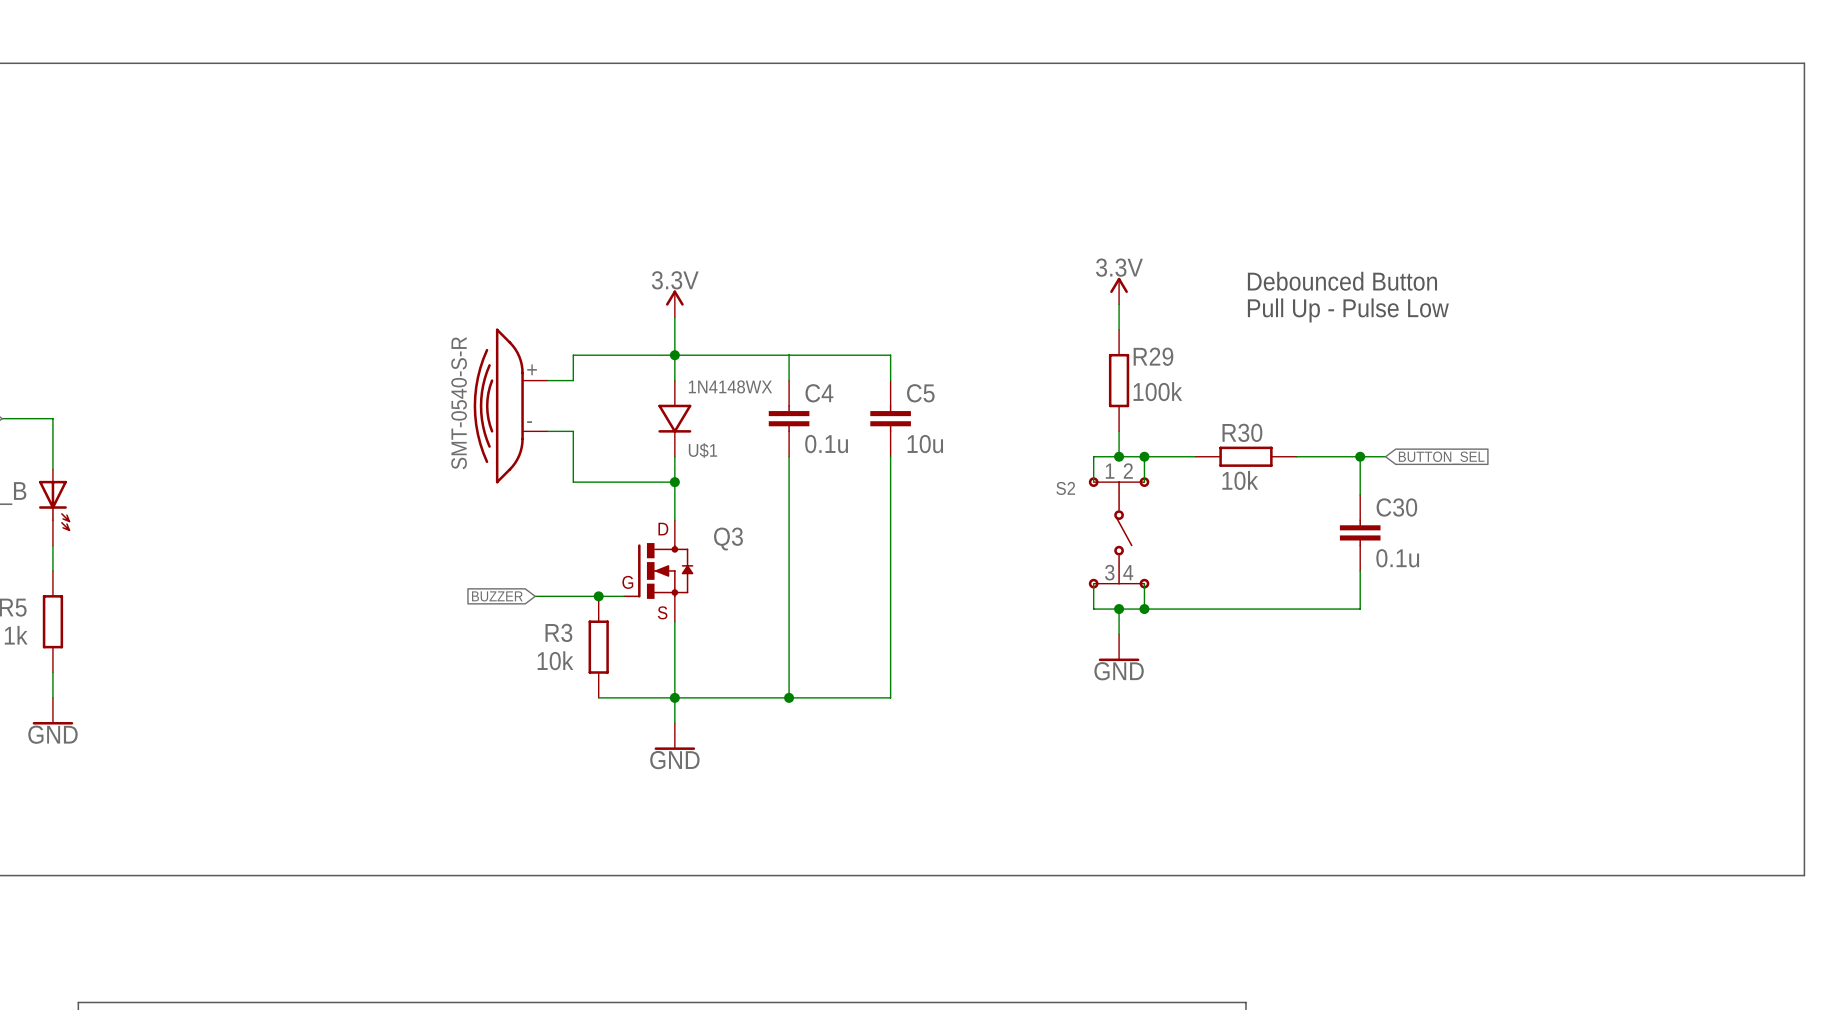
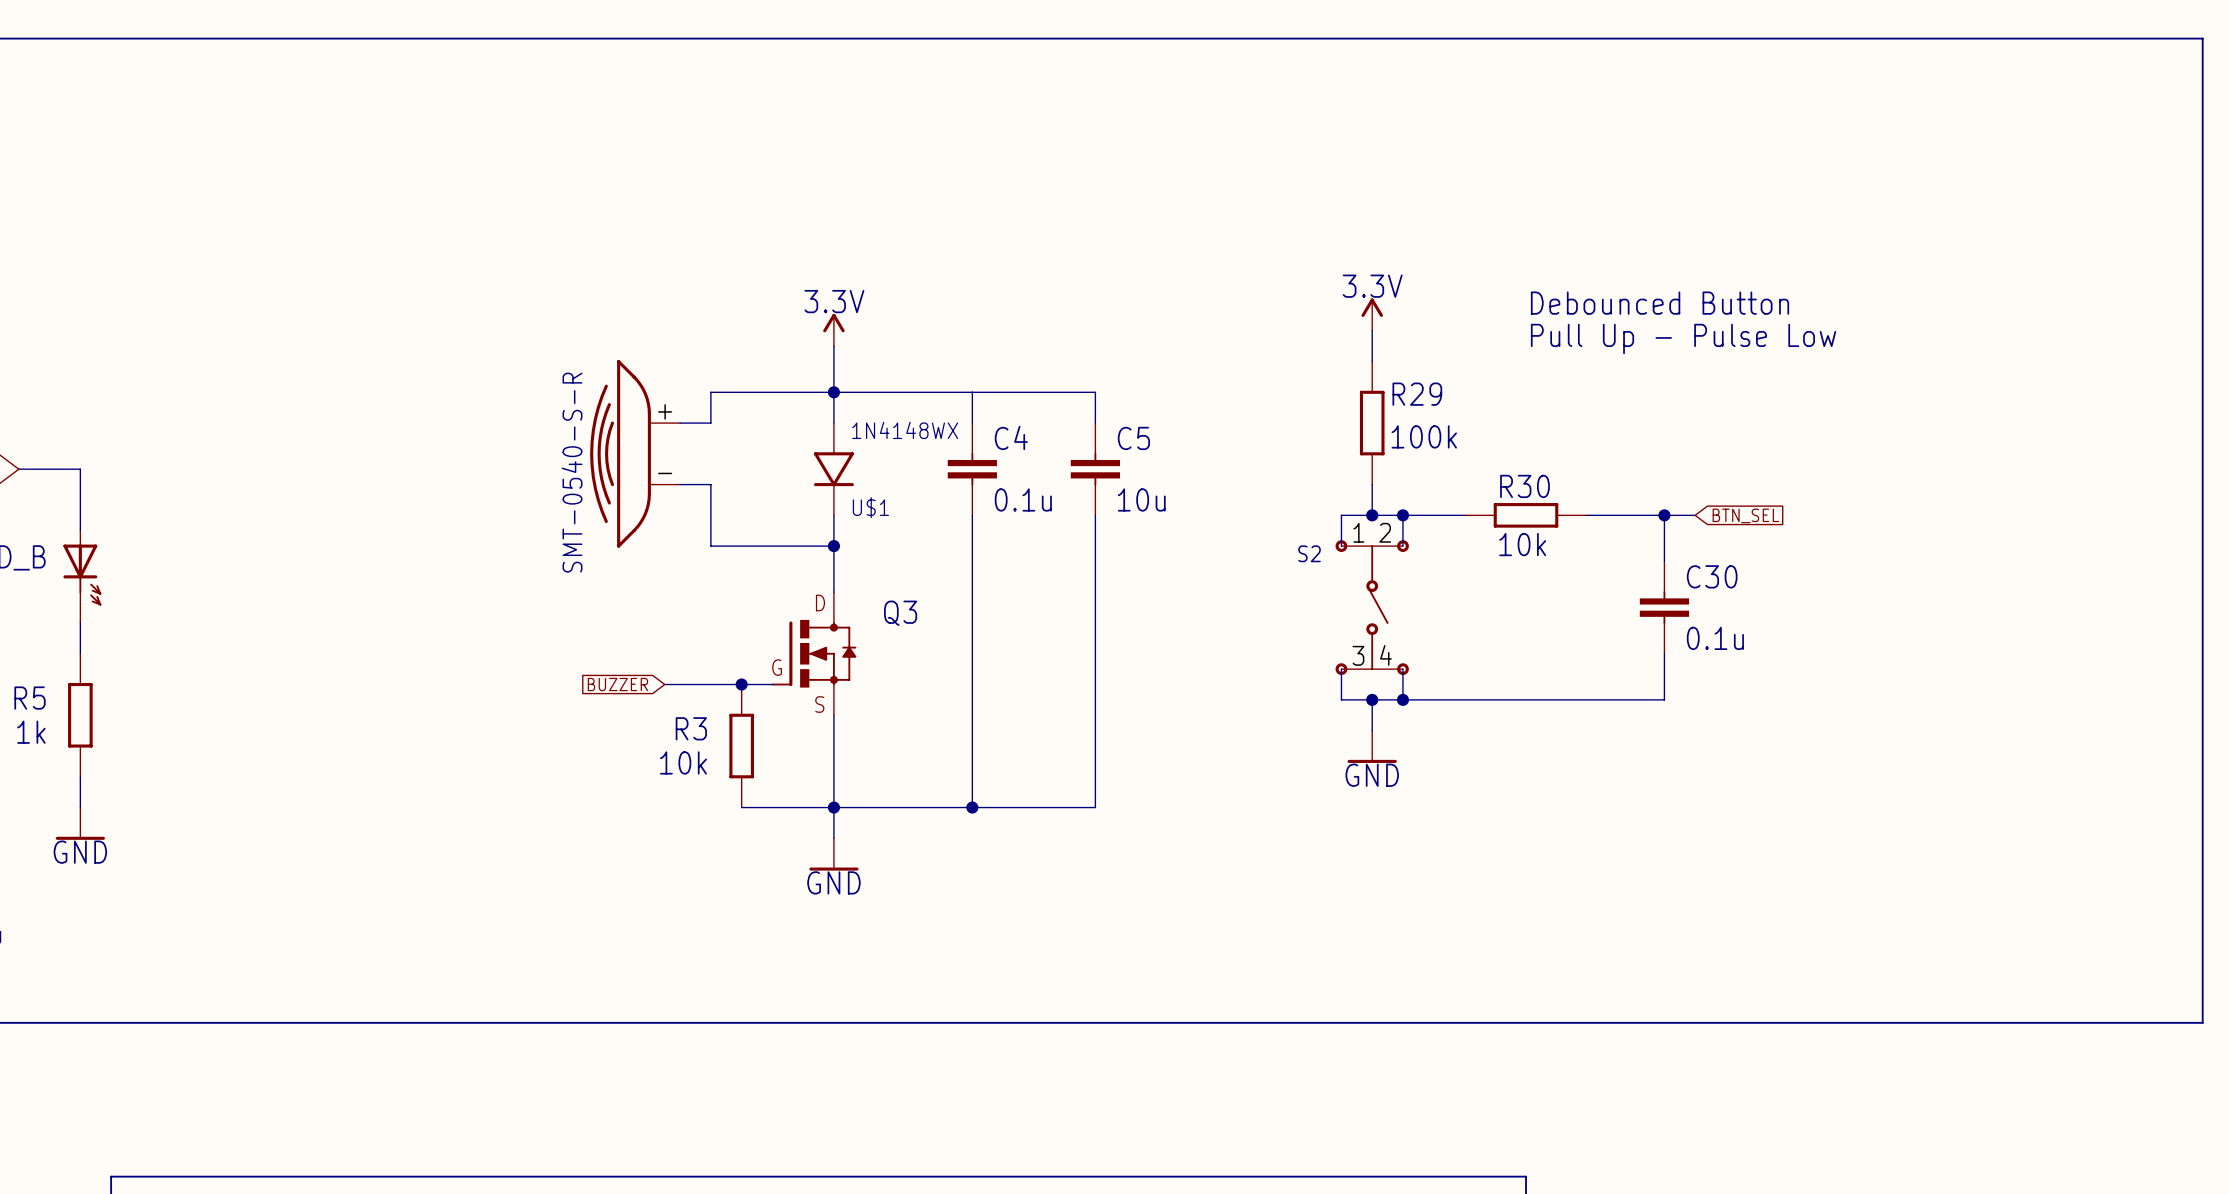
global label: BUTTON_SEL (1441, 458) -> BTN_SEL (1745, 515)

